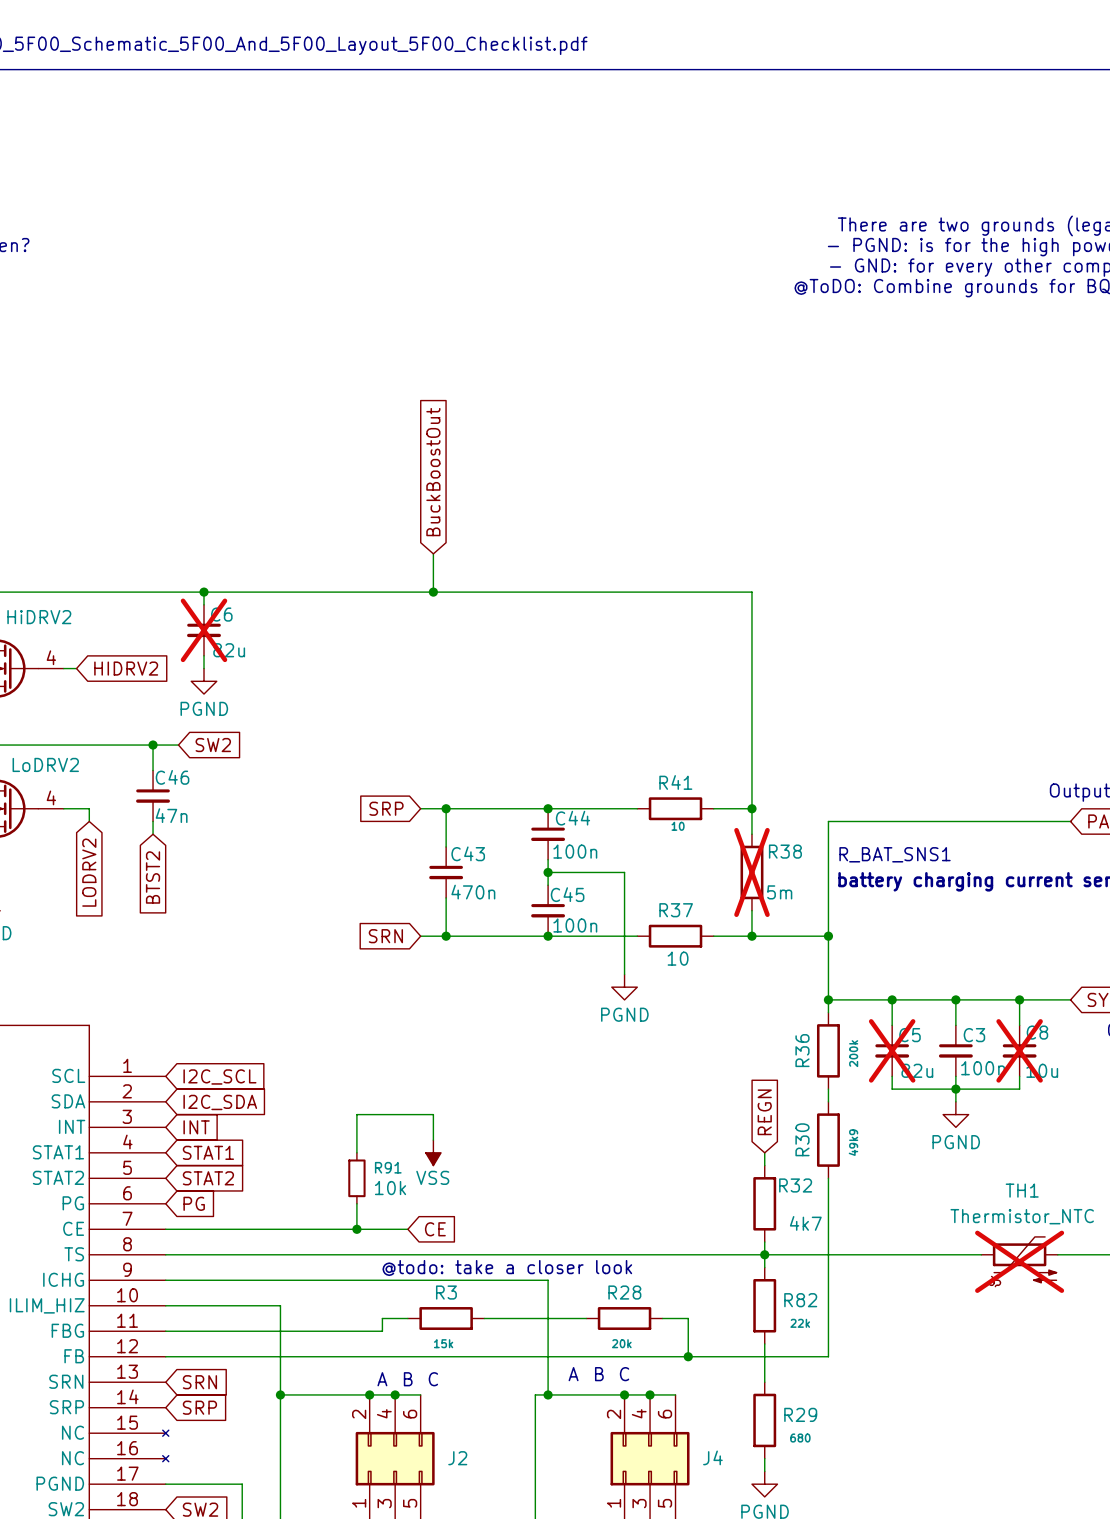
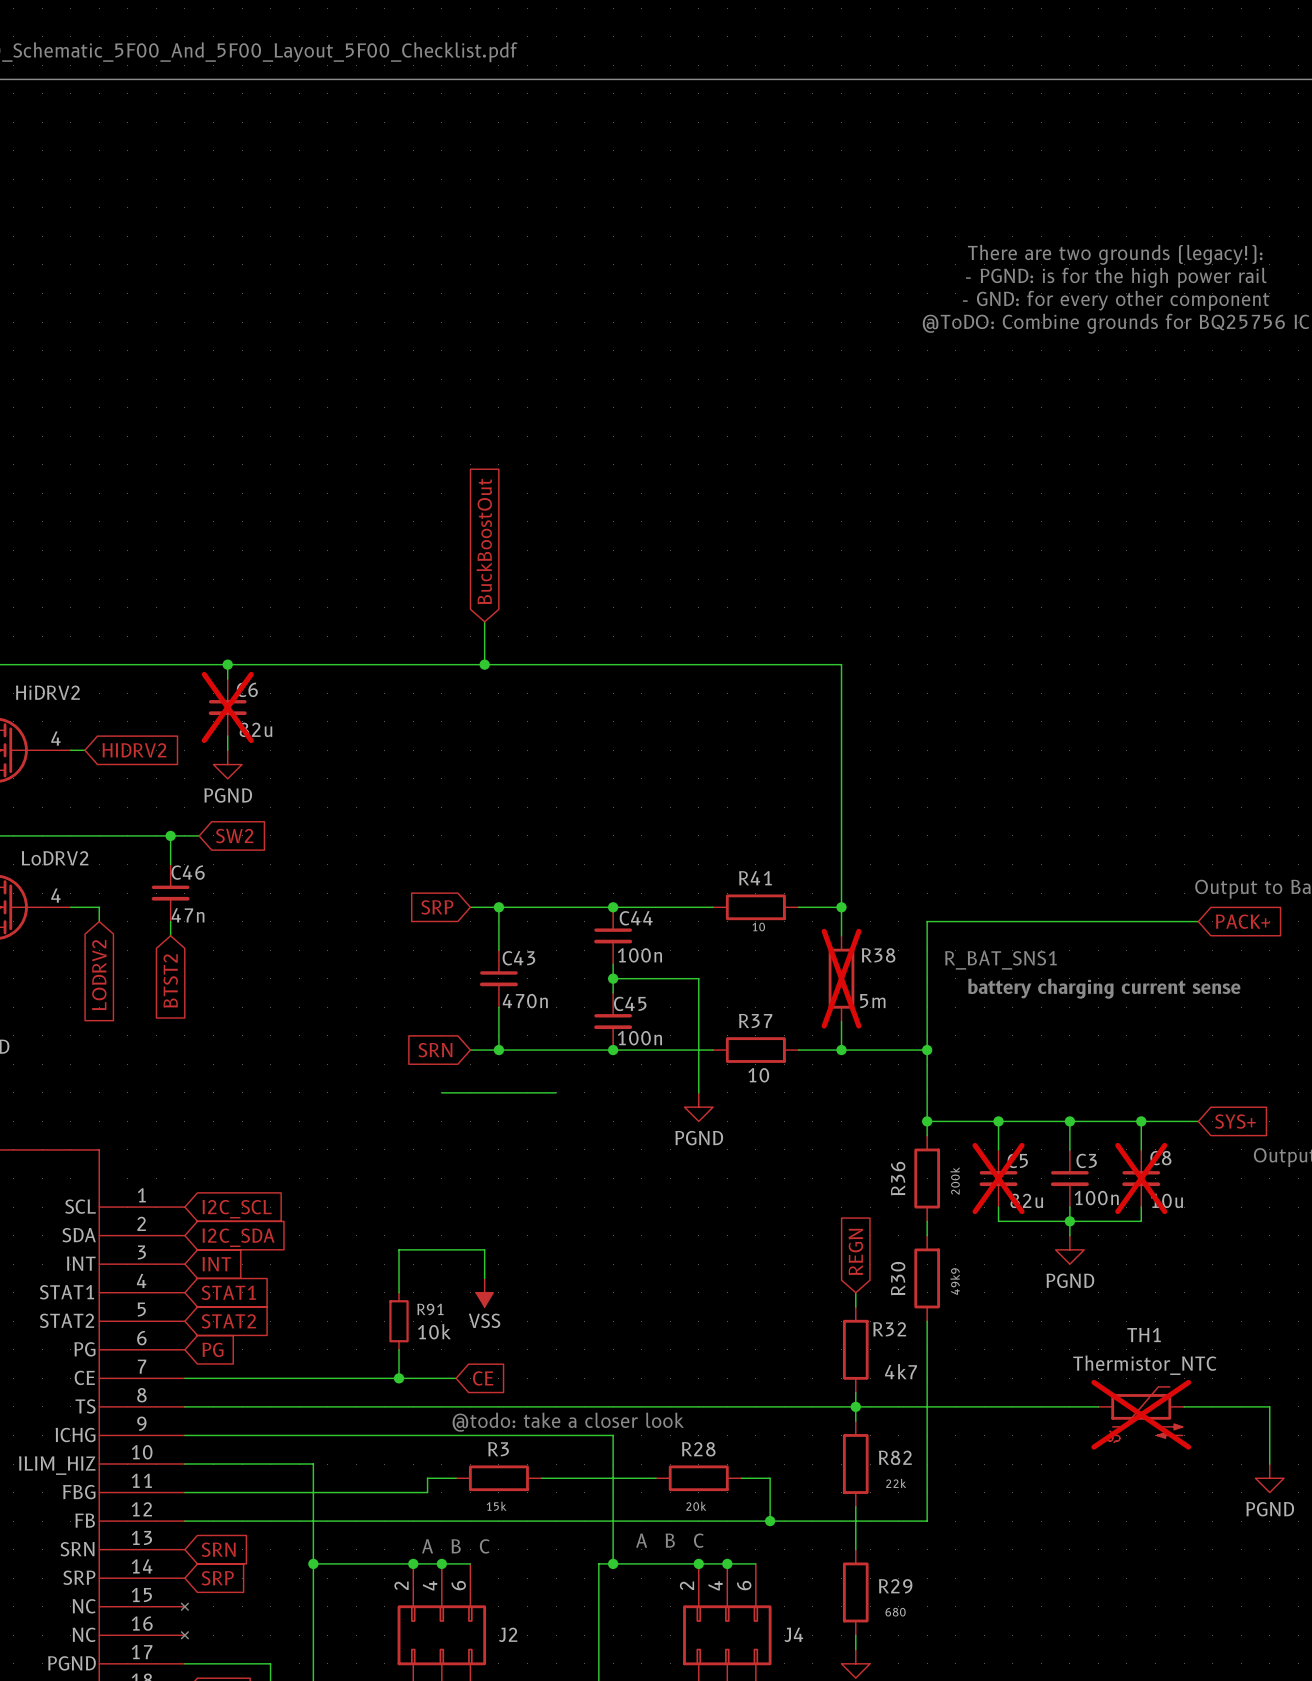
wire: none -> (441, 1092) (556, 1092)

